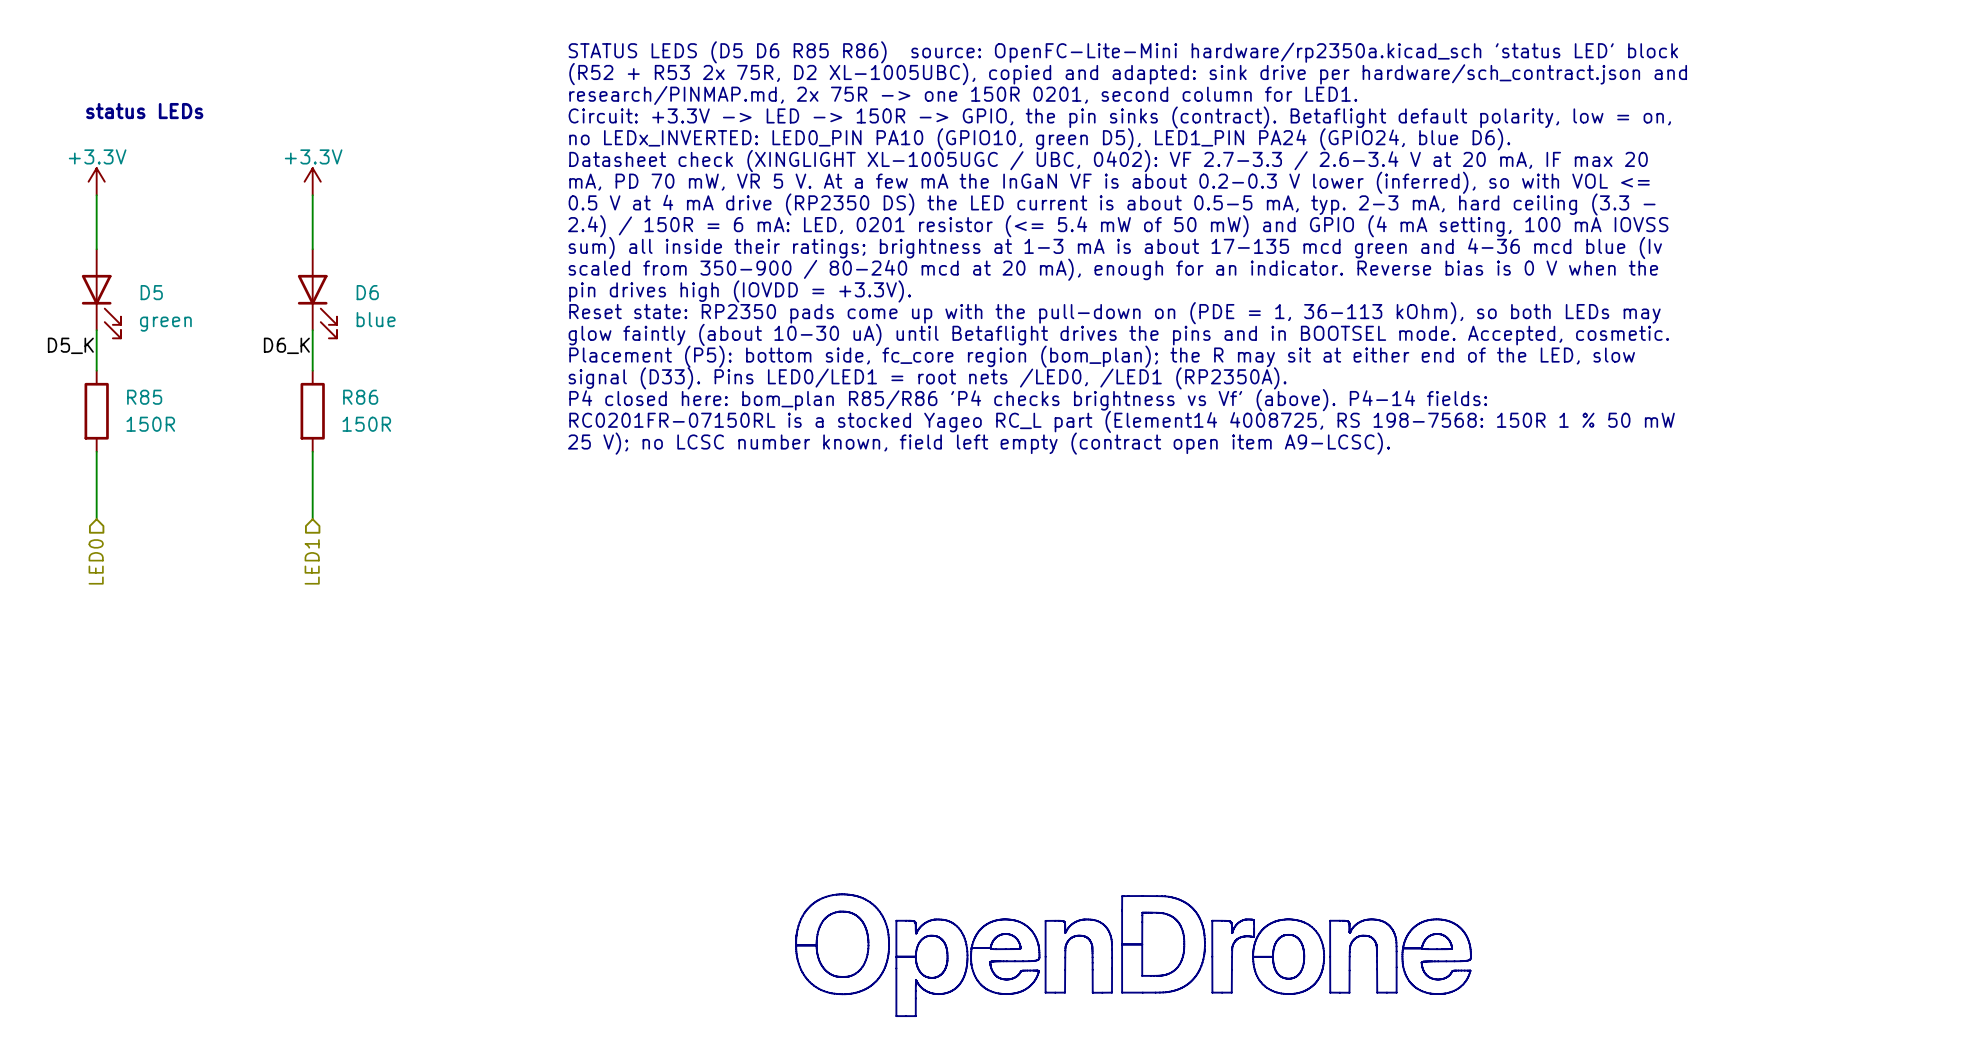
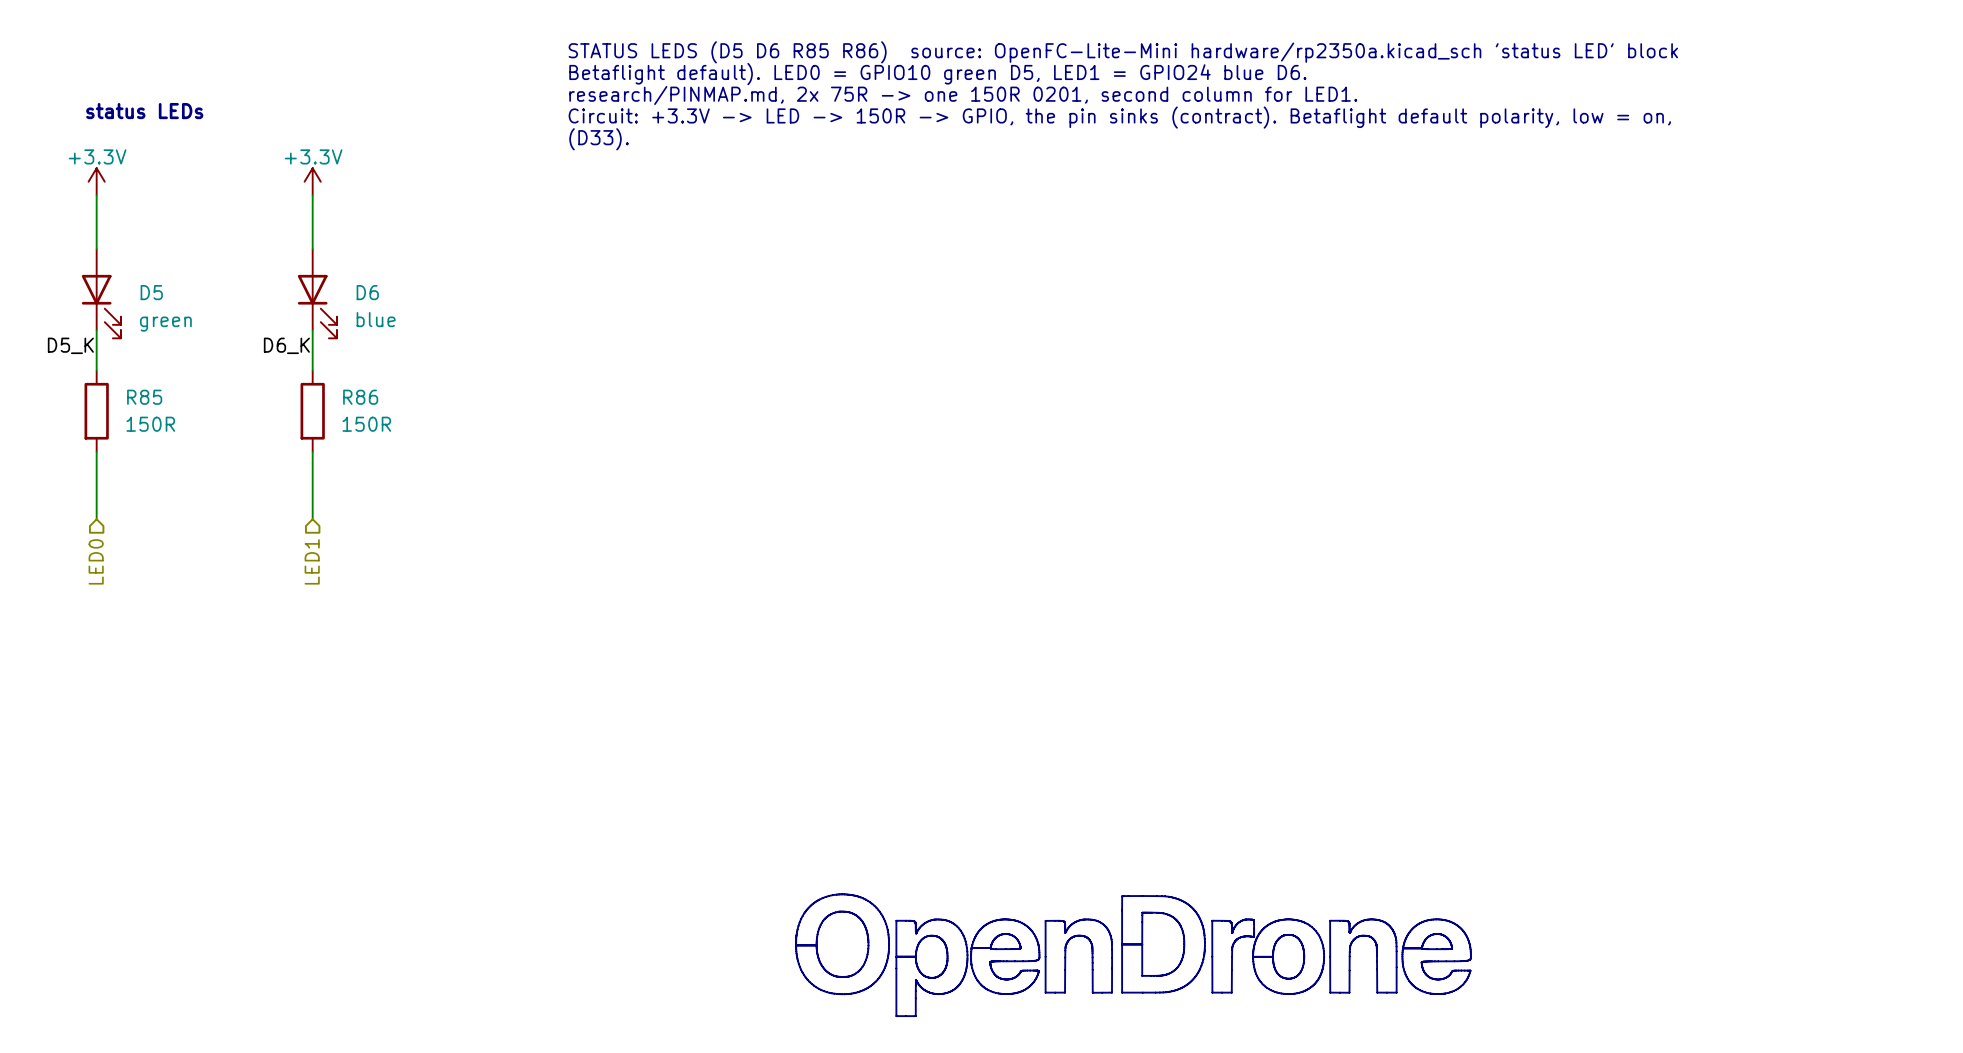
text: (R52 + R53 2x 75R, D2 XL-1005UBC), copied and adapted: sink drive per hardware/sch_contract.json and (1128, 74) -> Betaflight default). LED0 = GPIO10 green D5, LED1 = GPIO24 blue D6. (937, 74)
text: no LEDx_INVERTED: LED0_PIN PA10 (GPIO10, green D5), LED1_PIN PA24 (GPIO24, blue D6). (1039, 139) -> (D33). (599, 139)
text: Datasheet check (XINGLIGHT XL-1005UGC / UBC, 0402): VF 2.7-3.3 / 2.6-3.4 V at 20 mA, IF max 20 (1108, 161) -> none
text: mA, PD 70 mW, VR 5 V. At a few mA the InGaN VF is about 0.2-0.3 V lower (inferred), so with VOL <= (1109, 182) -> none
text: 0.5 V at 4 mA drive (RP2350 DS) the LED current is about 0.5-5 mA, typ. 2-3 mA, hard ceiling (3.3 - (1112, 204) -> none
text: 2.4) / 150R = 6 mA: LED, 0201 resistor (<= 5.4 mW of 50 mW) and GPIO (4 mA setting, 100 mA IOVSS (1118, 226) -> none
text: sum) all inside their ratings; brightness at 1-3 mA is about 17-135 mcd green and 4-36 mcd blue (Iv (1115, 247) -> none
text: scaled from 350-900 / 80-240 mcd at 20 mA), enough for an indicator. Reverse bias is 0 V when the (1113, 269) -> none
text: pin drives high (IOVDD = +3.3V). (740, 291) -> none
text: Reset state: RP2350 pads come up with the pull-down on (PDE = 1, 36-113 kOhm), so both LEDs may (1114, 313) -> none
text: glow faintly (about 10-30 uA) until Betaflight drives the pins and in BOOTSEL mode. Accepted, cosmetic. (1118, 334) -> none
text: Placement (P5): bottom side, fc_core region (bom_plan); the R may sit at either end of the LED, slow (1102, 356) -> none
text: signal (D33). Pins LED0/LED1 = root nets /LED0, /LED1 (RP2350A). (927, 378) -> none
text: P4 closed here: bom_plan R85/R86 'P4 checks brightness vs Vf' (above). P4-14 fields: (1028, 400) -> none
text: RC0201FR-07150RL is a stocked Yageo RC_L part (Element14 4008725, RS 198-7568: 150R 1 % 50 mW (1122, 421) -> none
text: 25 V); no LCSC number known, field left empty (contract open item A9-LCSC). (979, 443) -> none

